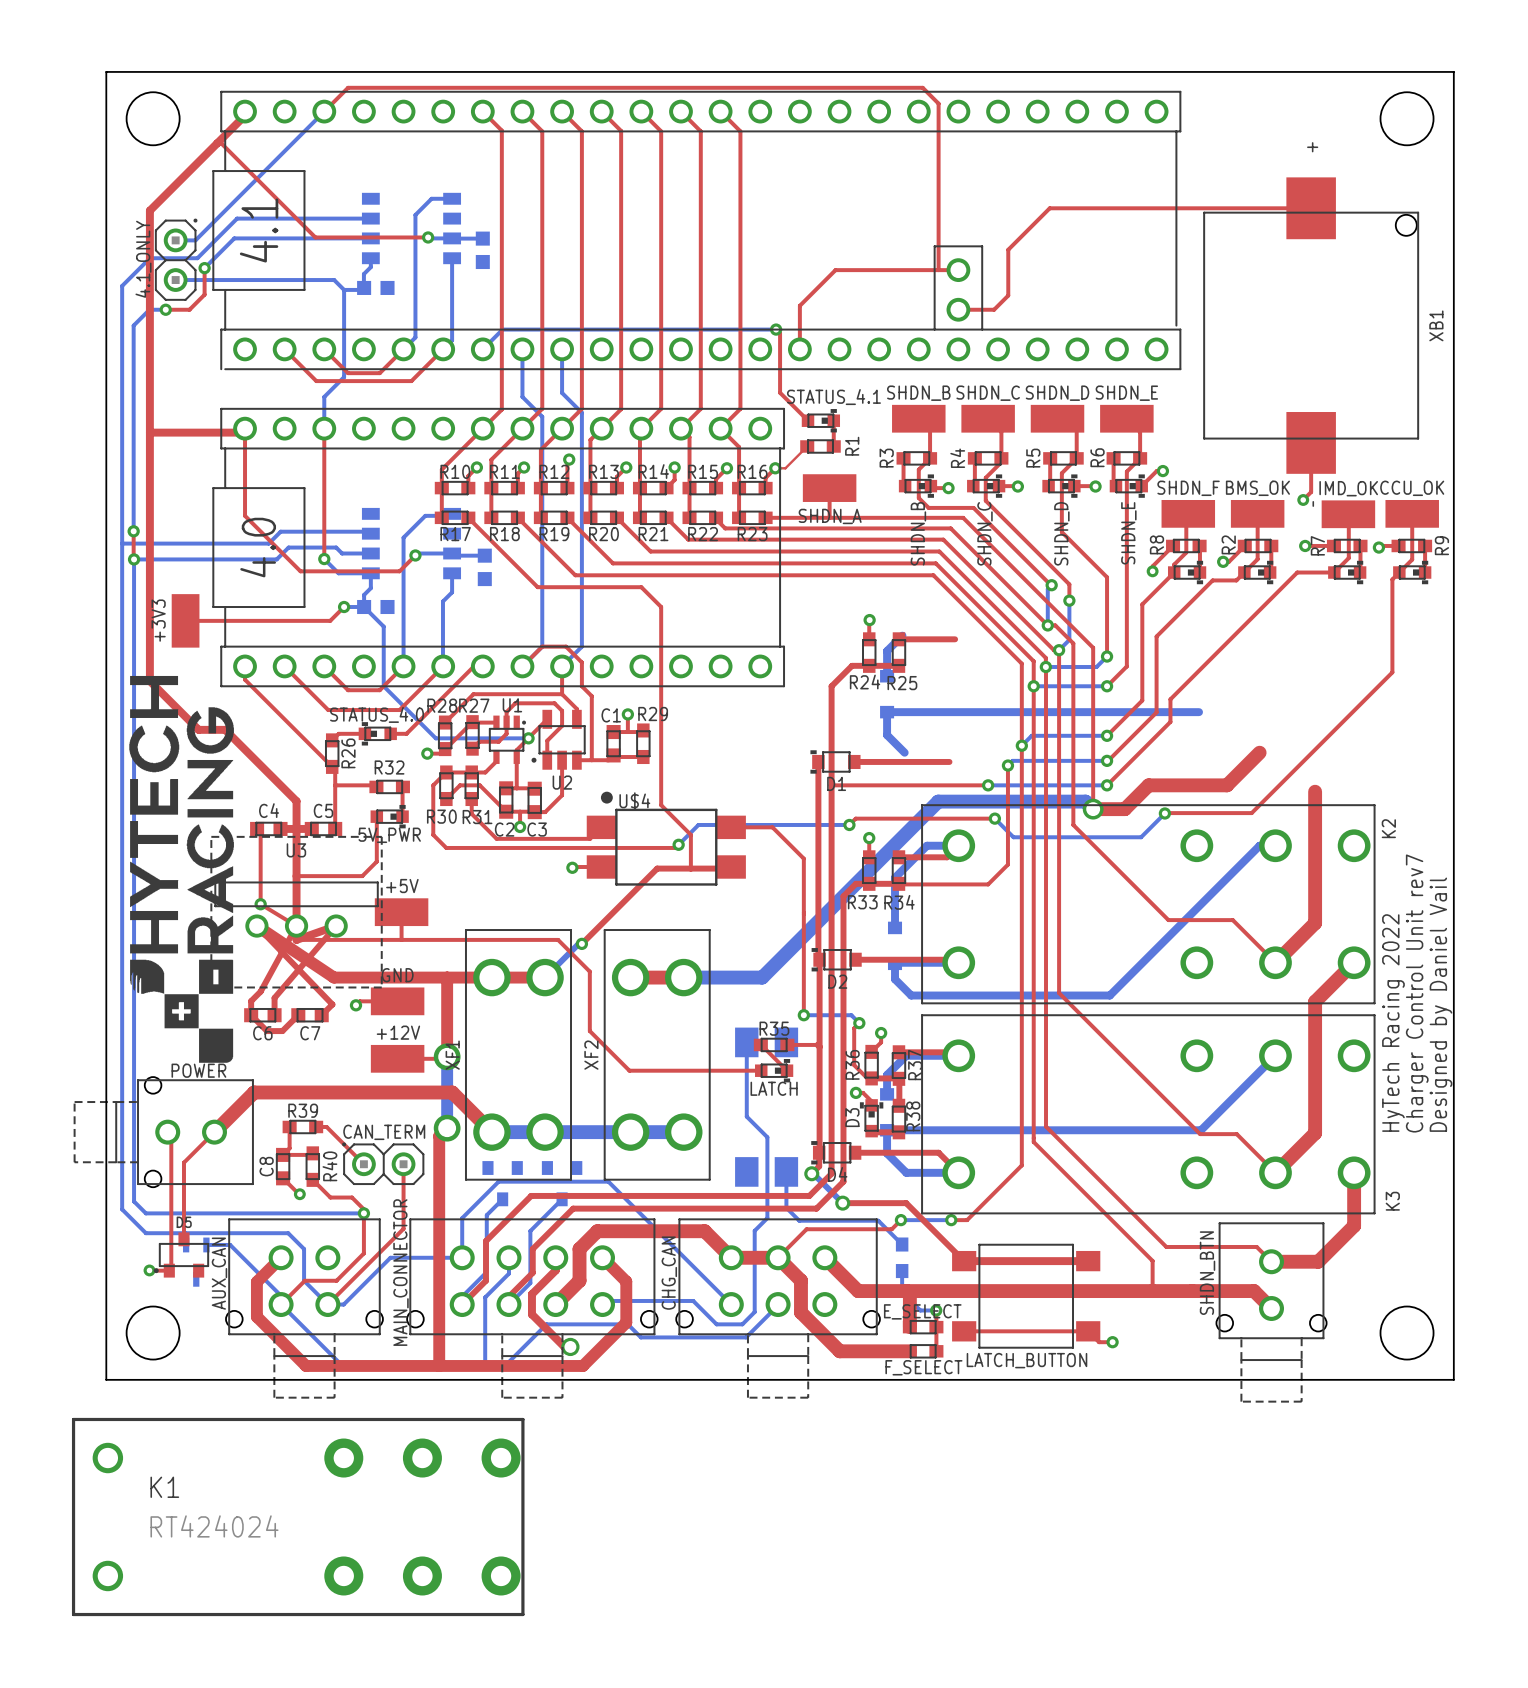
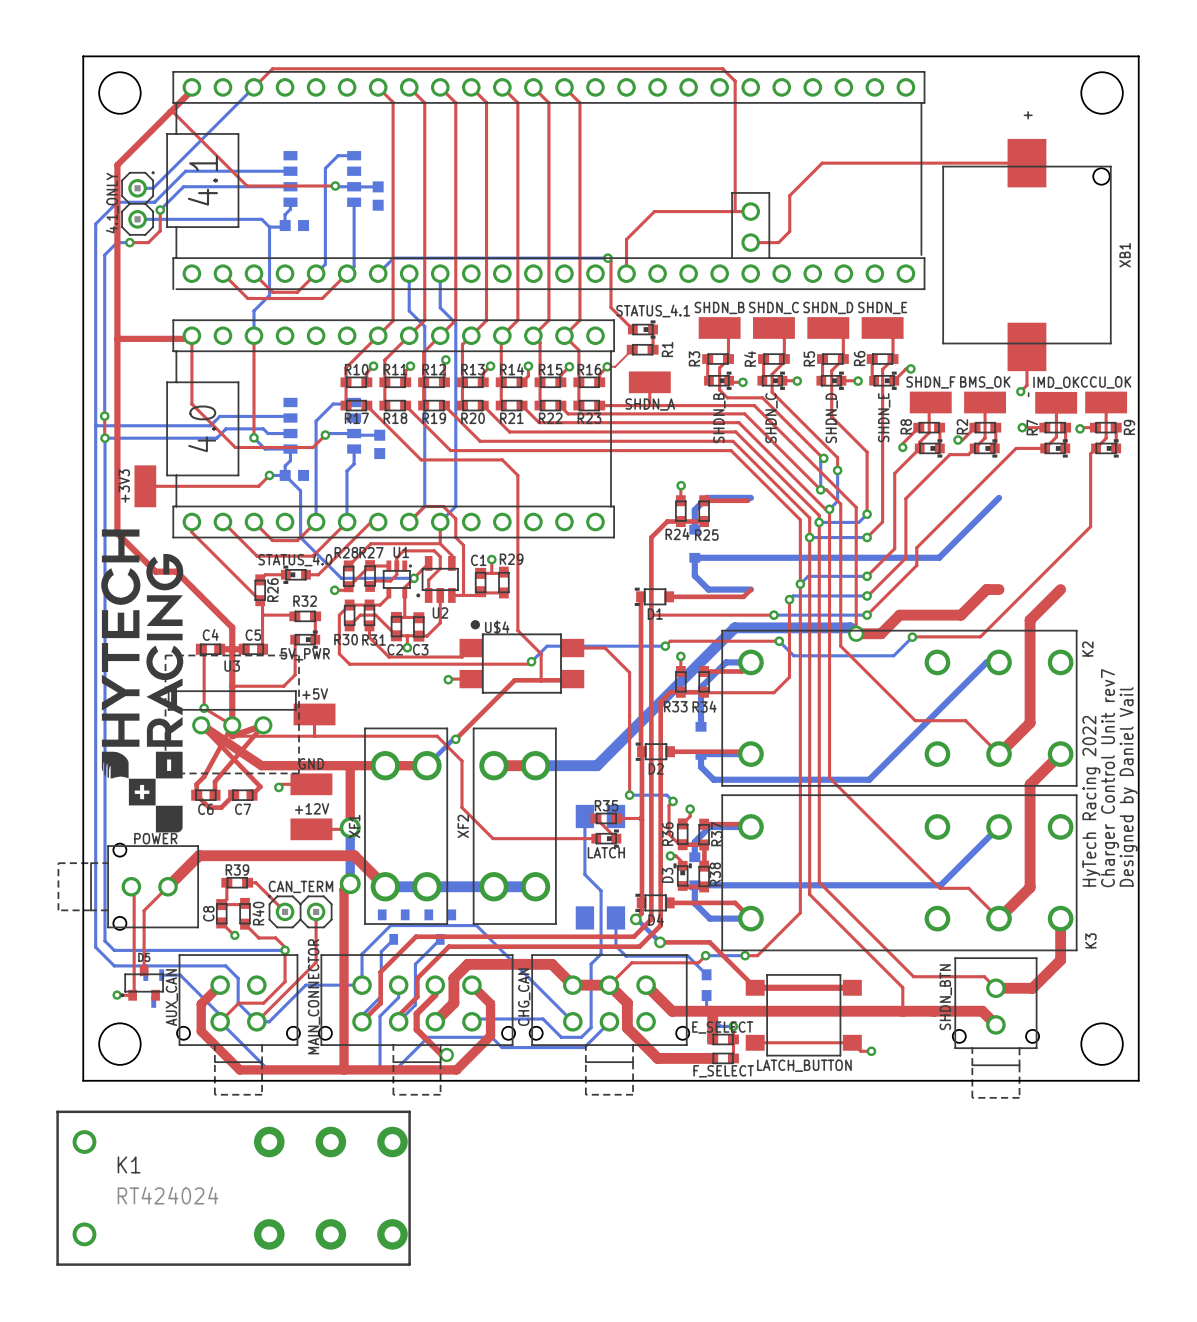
bottom track: none -> (706, 497) (750, 497)
bottom track: none -> (999, 497) (939, 557)
bottom track: none -> (708, 589) (750, 589)
top track: none -> (750, 589) (743, 596)
top track: none -> (986, 589) (999, 589)
top track: none -> (1060, 589) (1030, 620)

